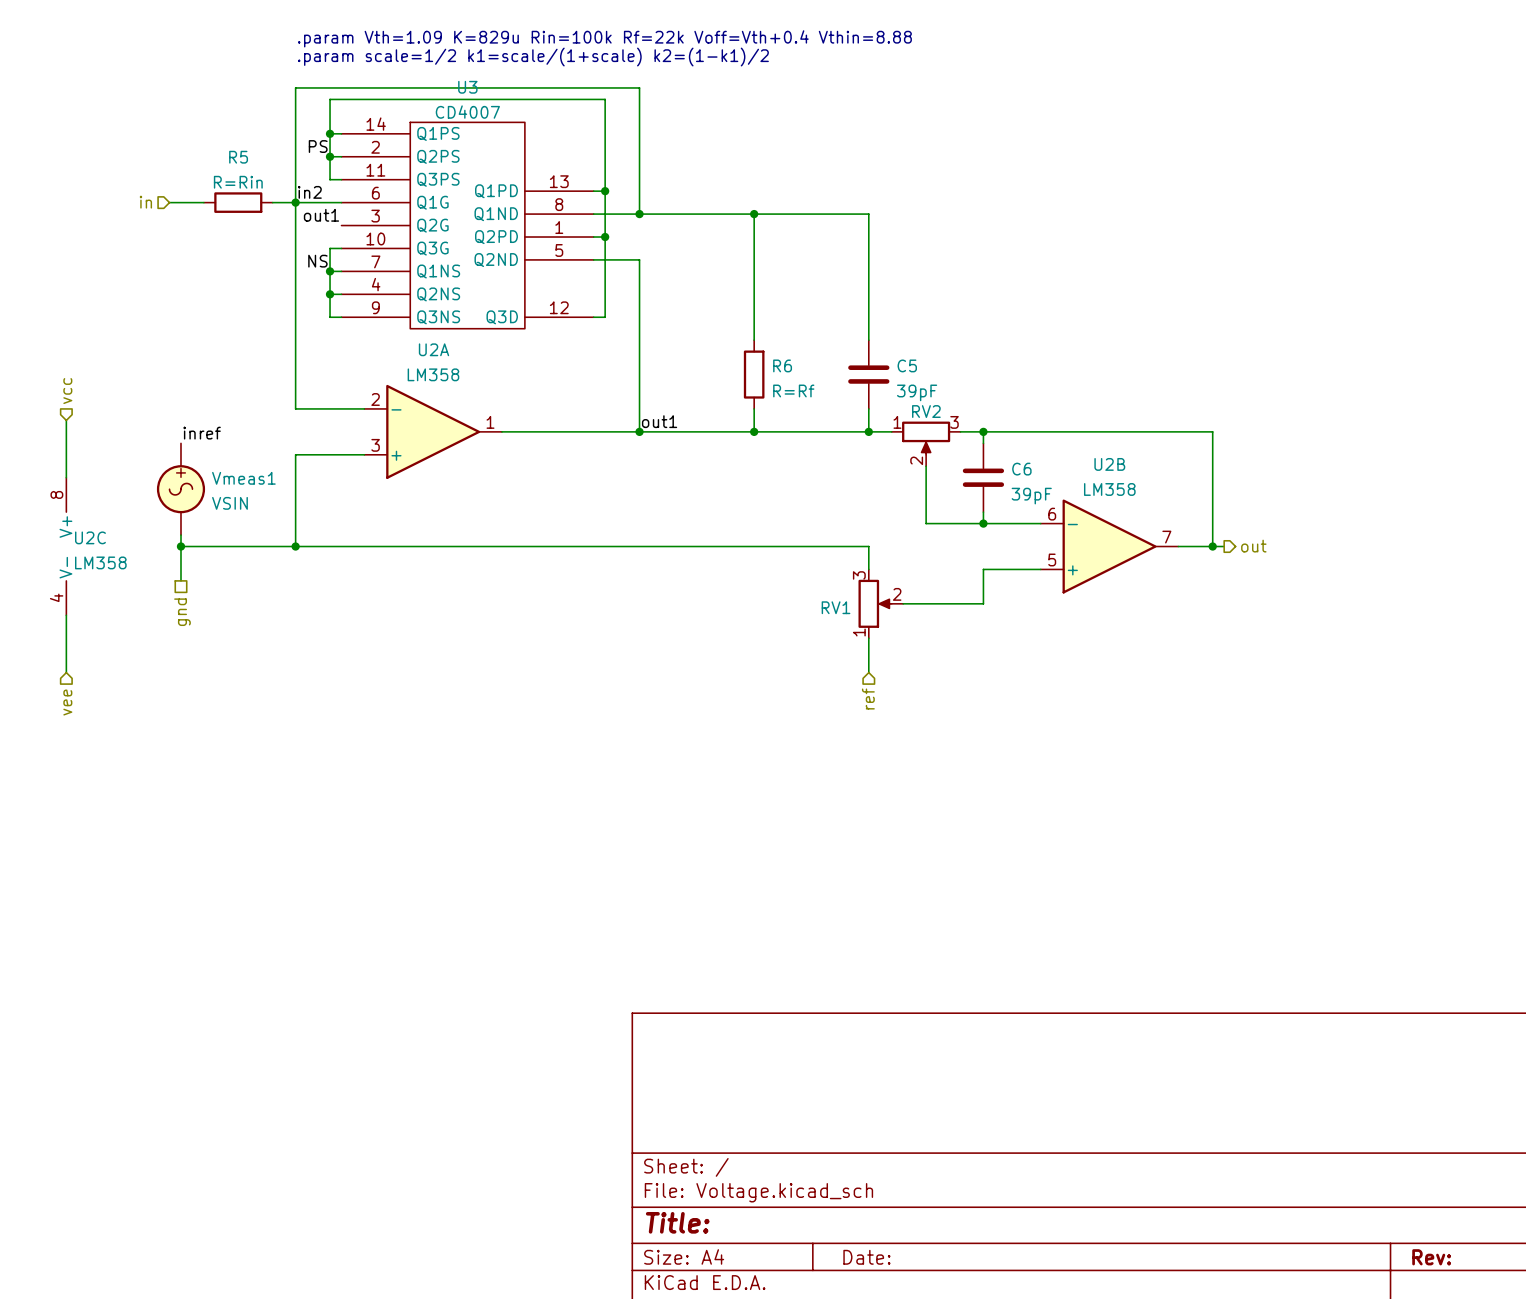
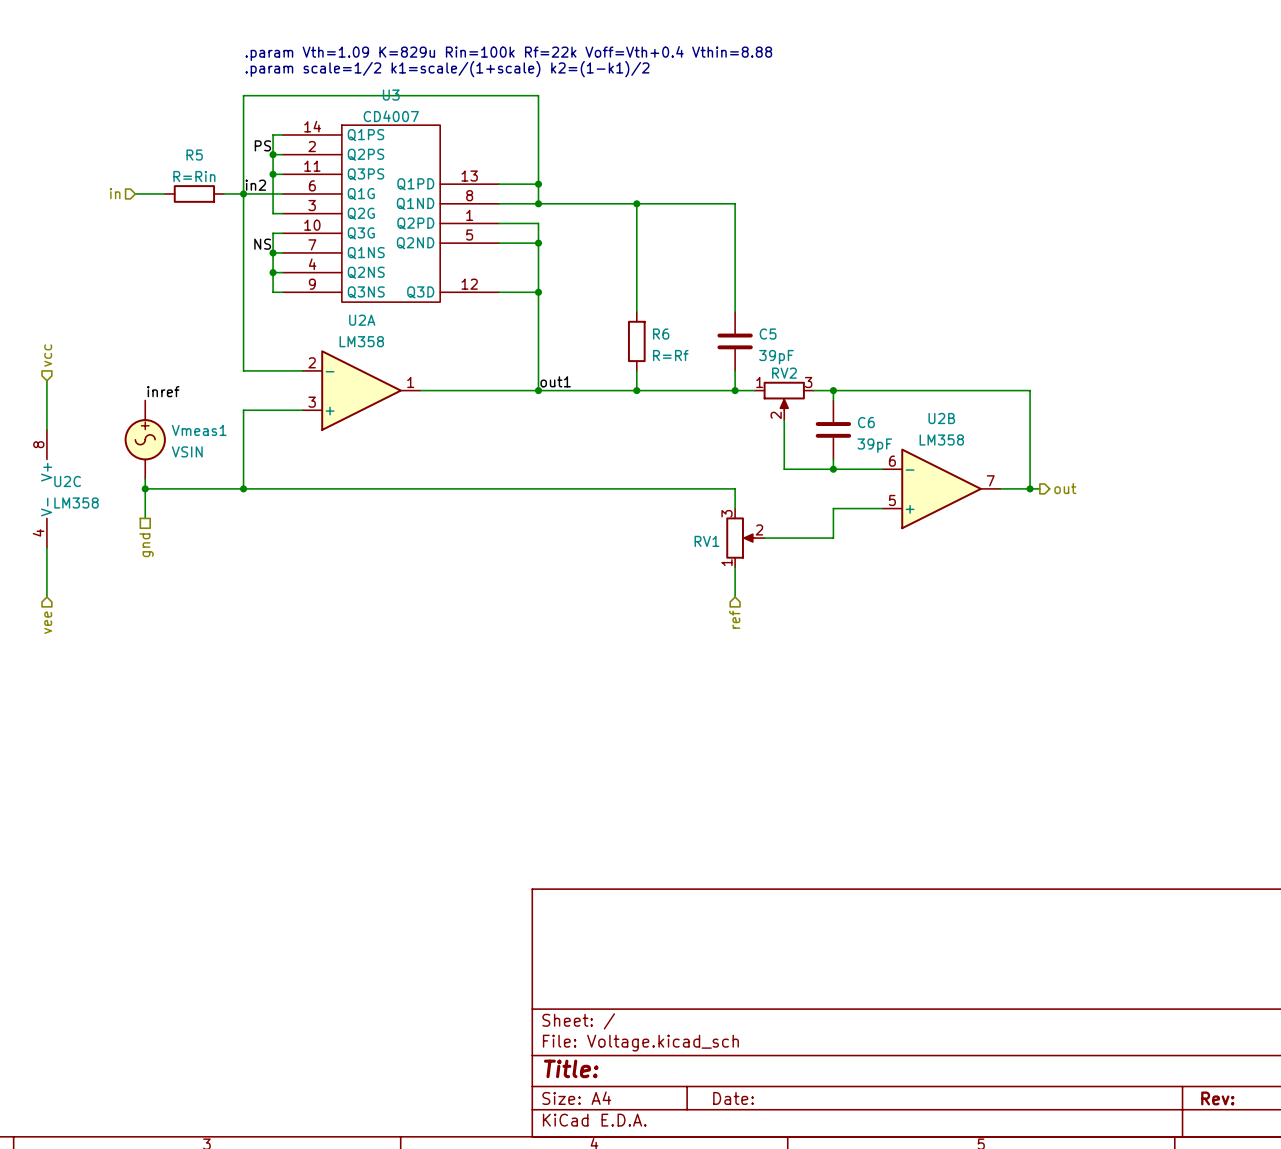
wire: (330, 133) (330, 99) (605, 99) (605, 317) -> (538, 292) (508, 292)
junction position: (330, 133) -> (273, 174)
wire: none -> (273, 174) (273, 213) (282, 213)
wire: none -> (508, 184) (538, 184)
junction: (605, 191) -> none
junction: none -> (538, 184)
label: out1 (321, 215) -> none
wire: none -> (508, 223) (538, 223) (538, 243)
junction: (605, 237) -> none
junction: none -> (538, 243)
junction: none -> (538, 292)

